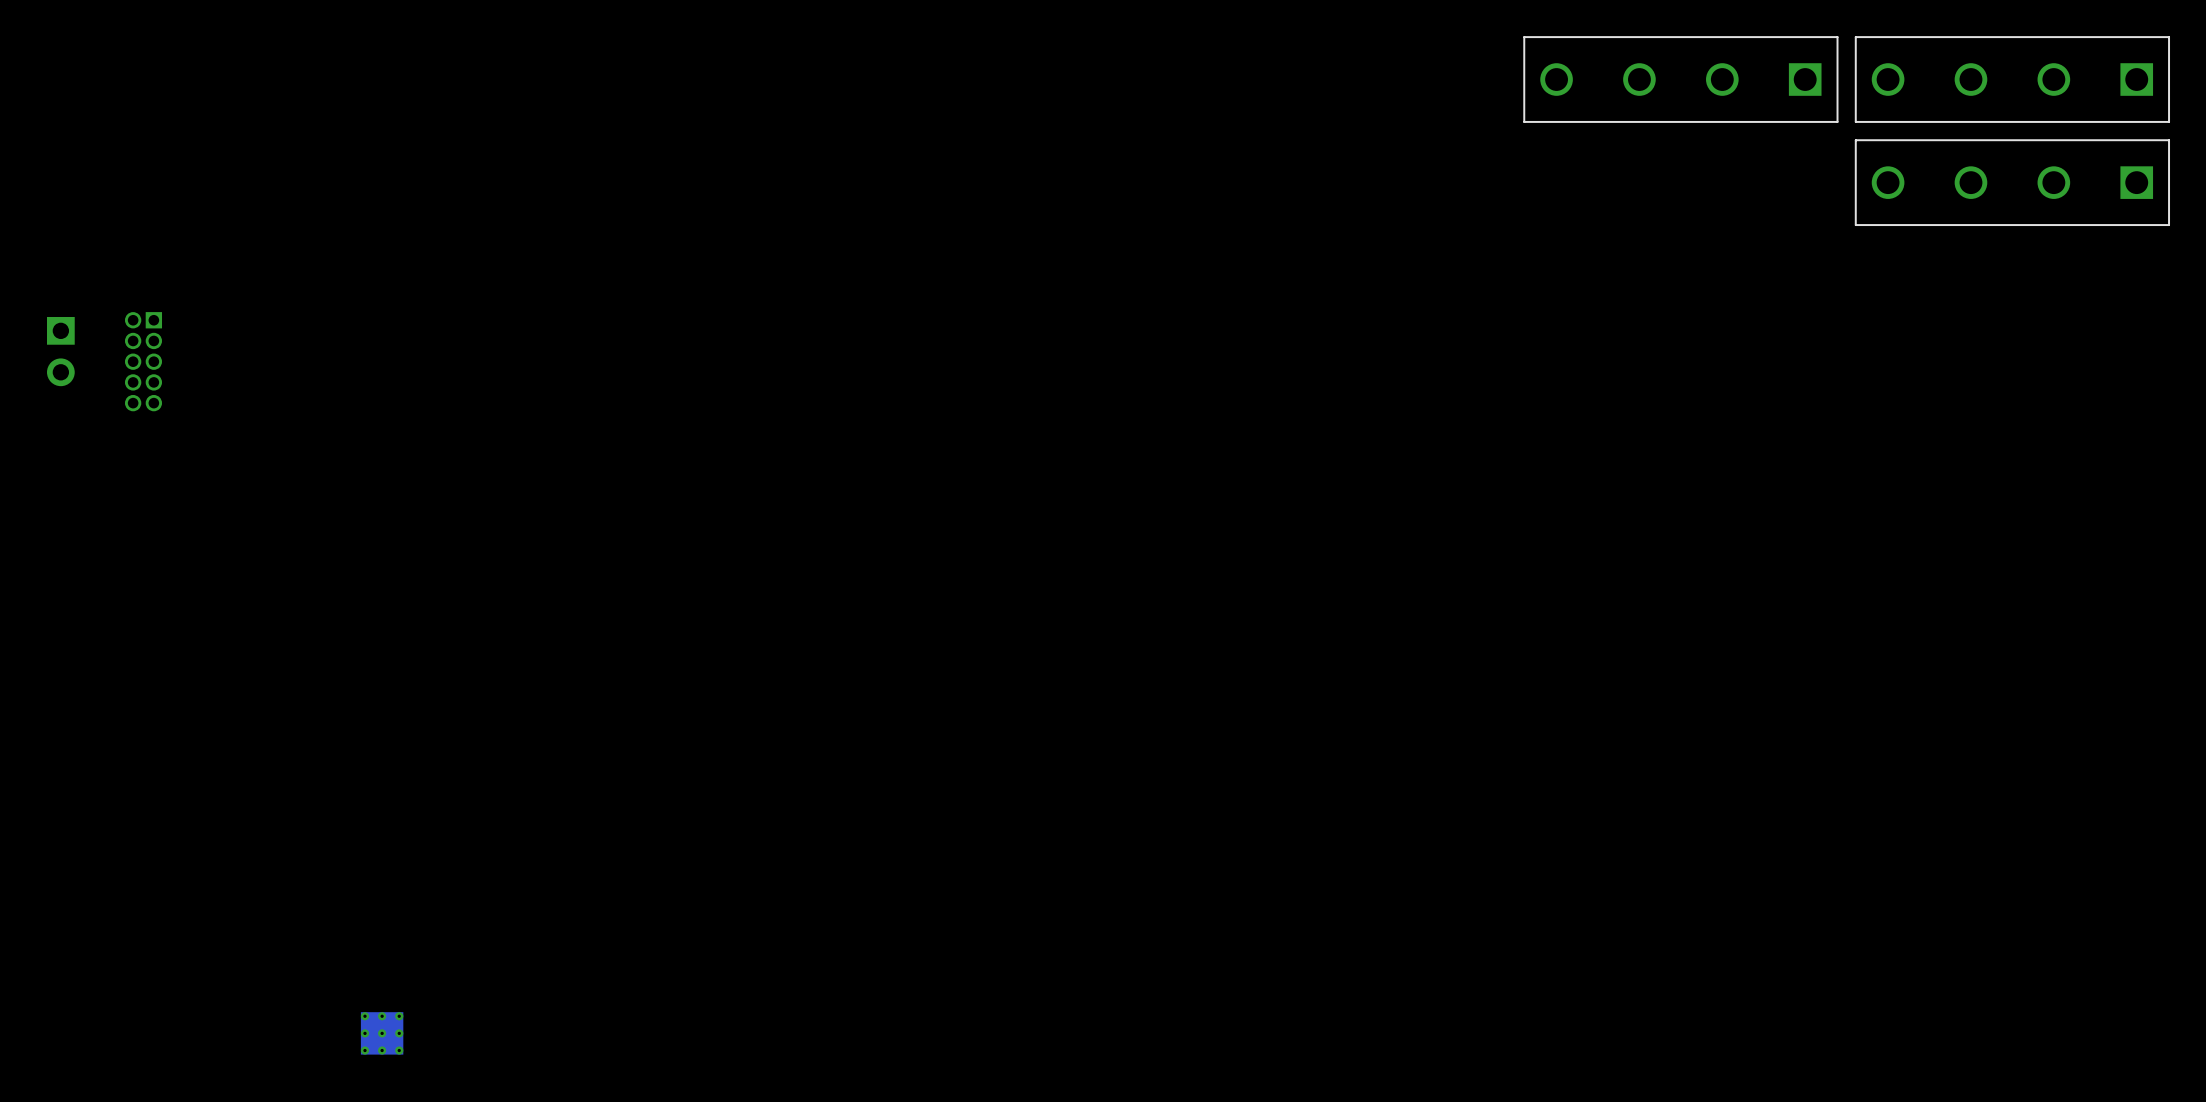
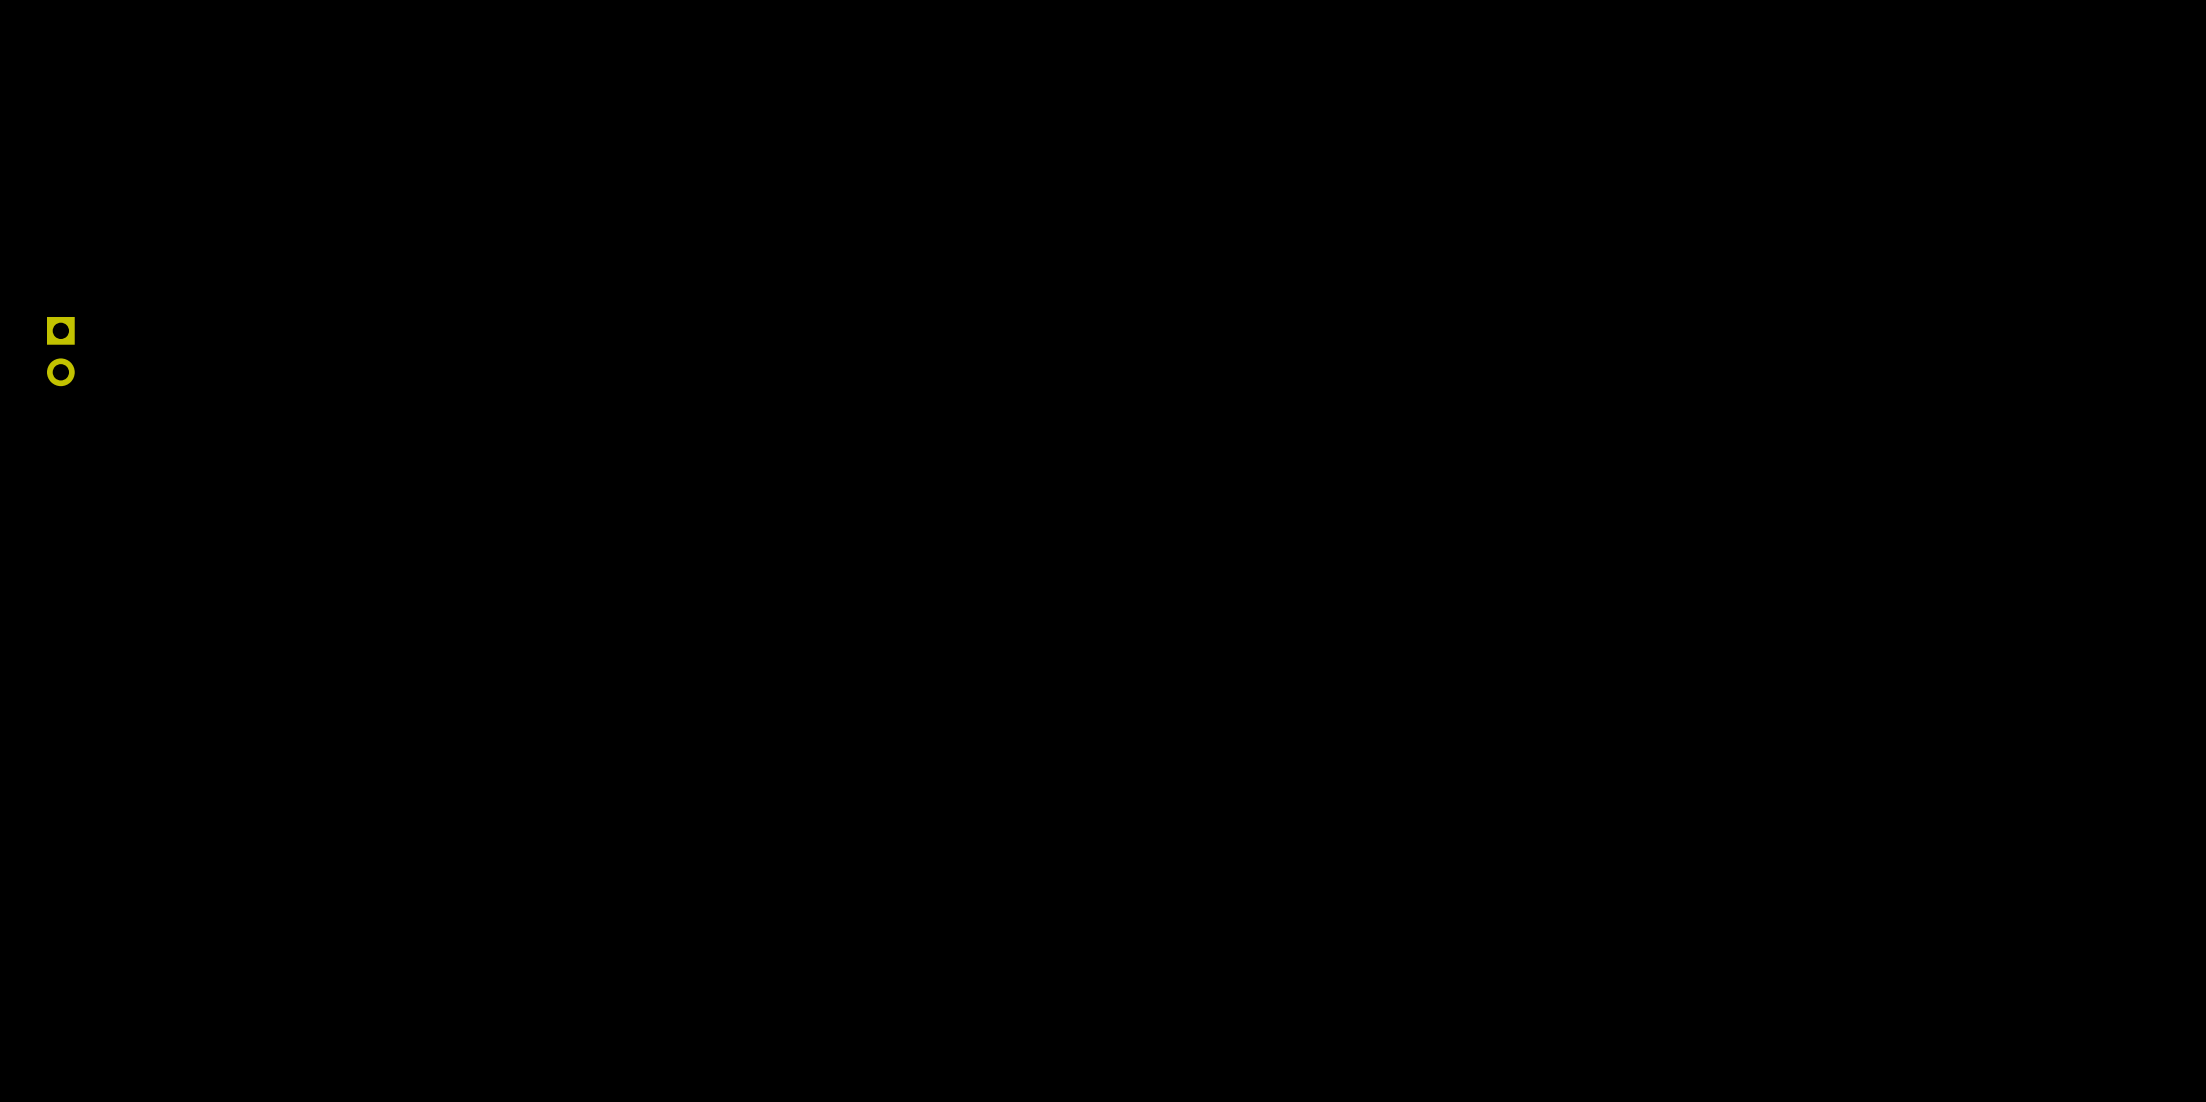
part: (1680, 79) -> none
part: (2012, 79) -> none
part: (2012, 182) -> none
part: (143, 361) -> none
part: (382, 1033) -> none

